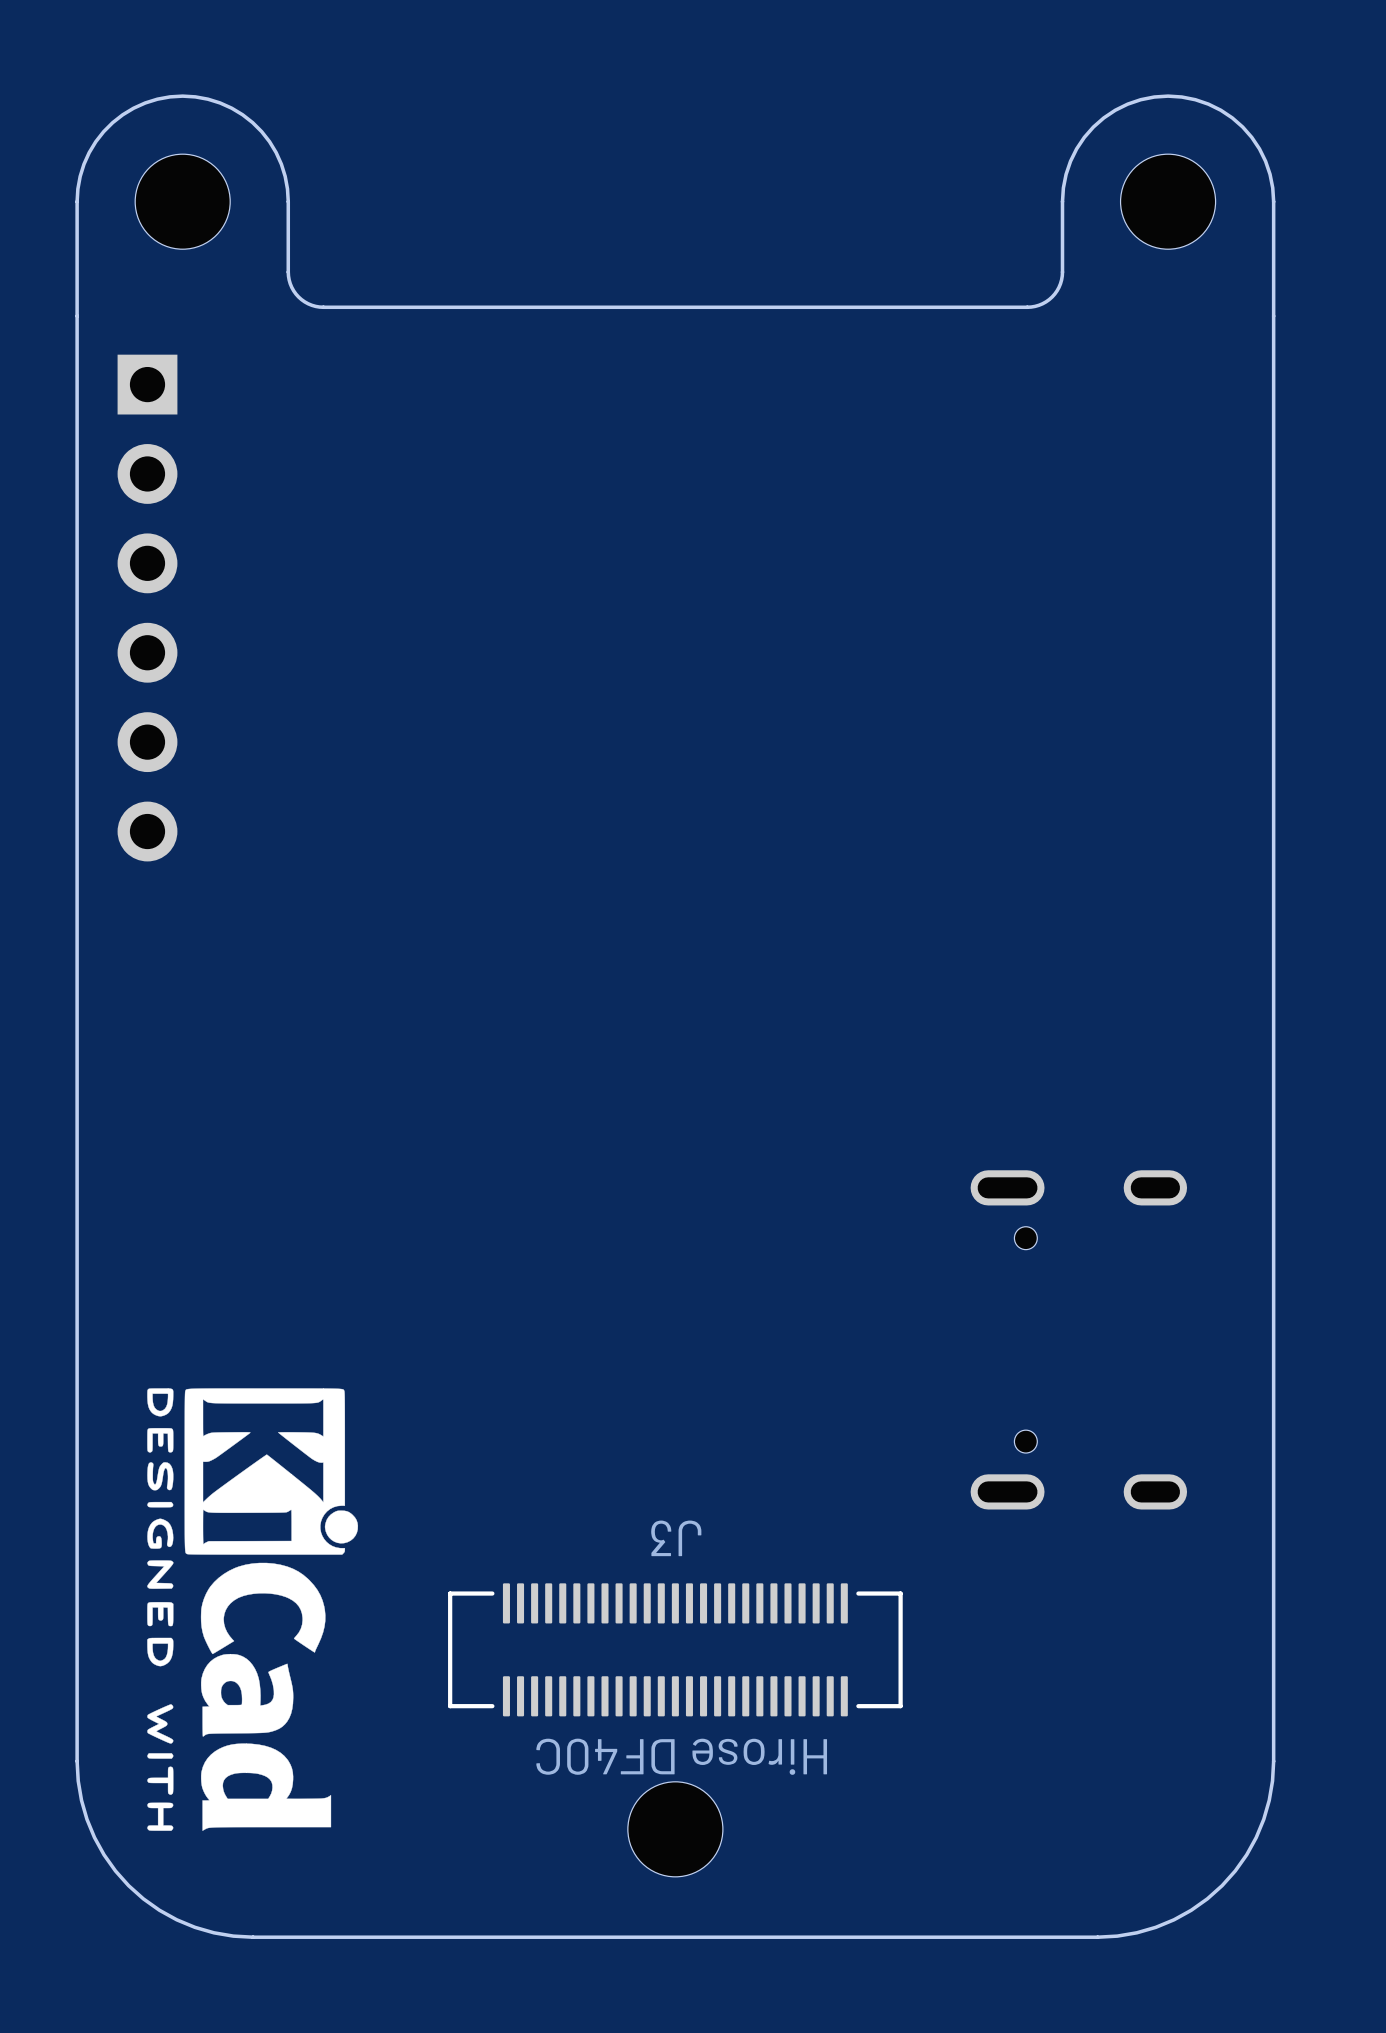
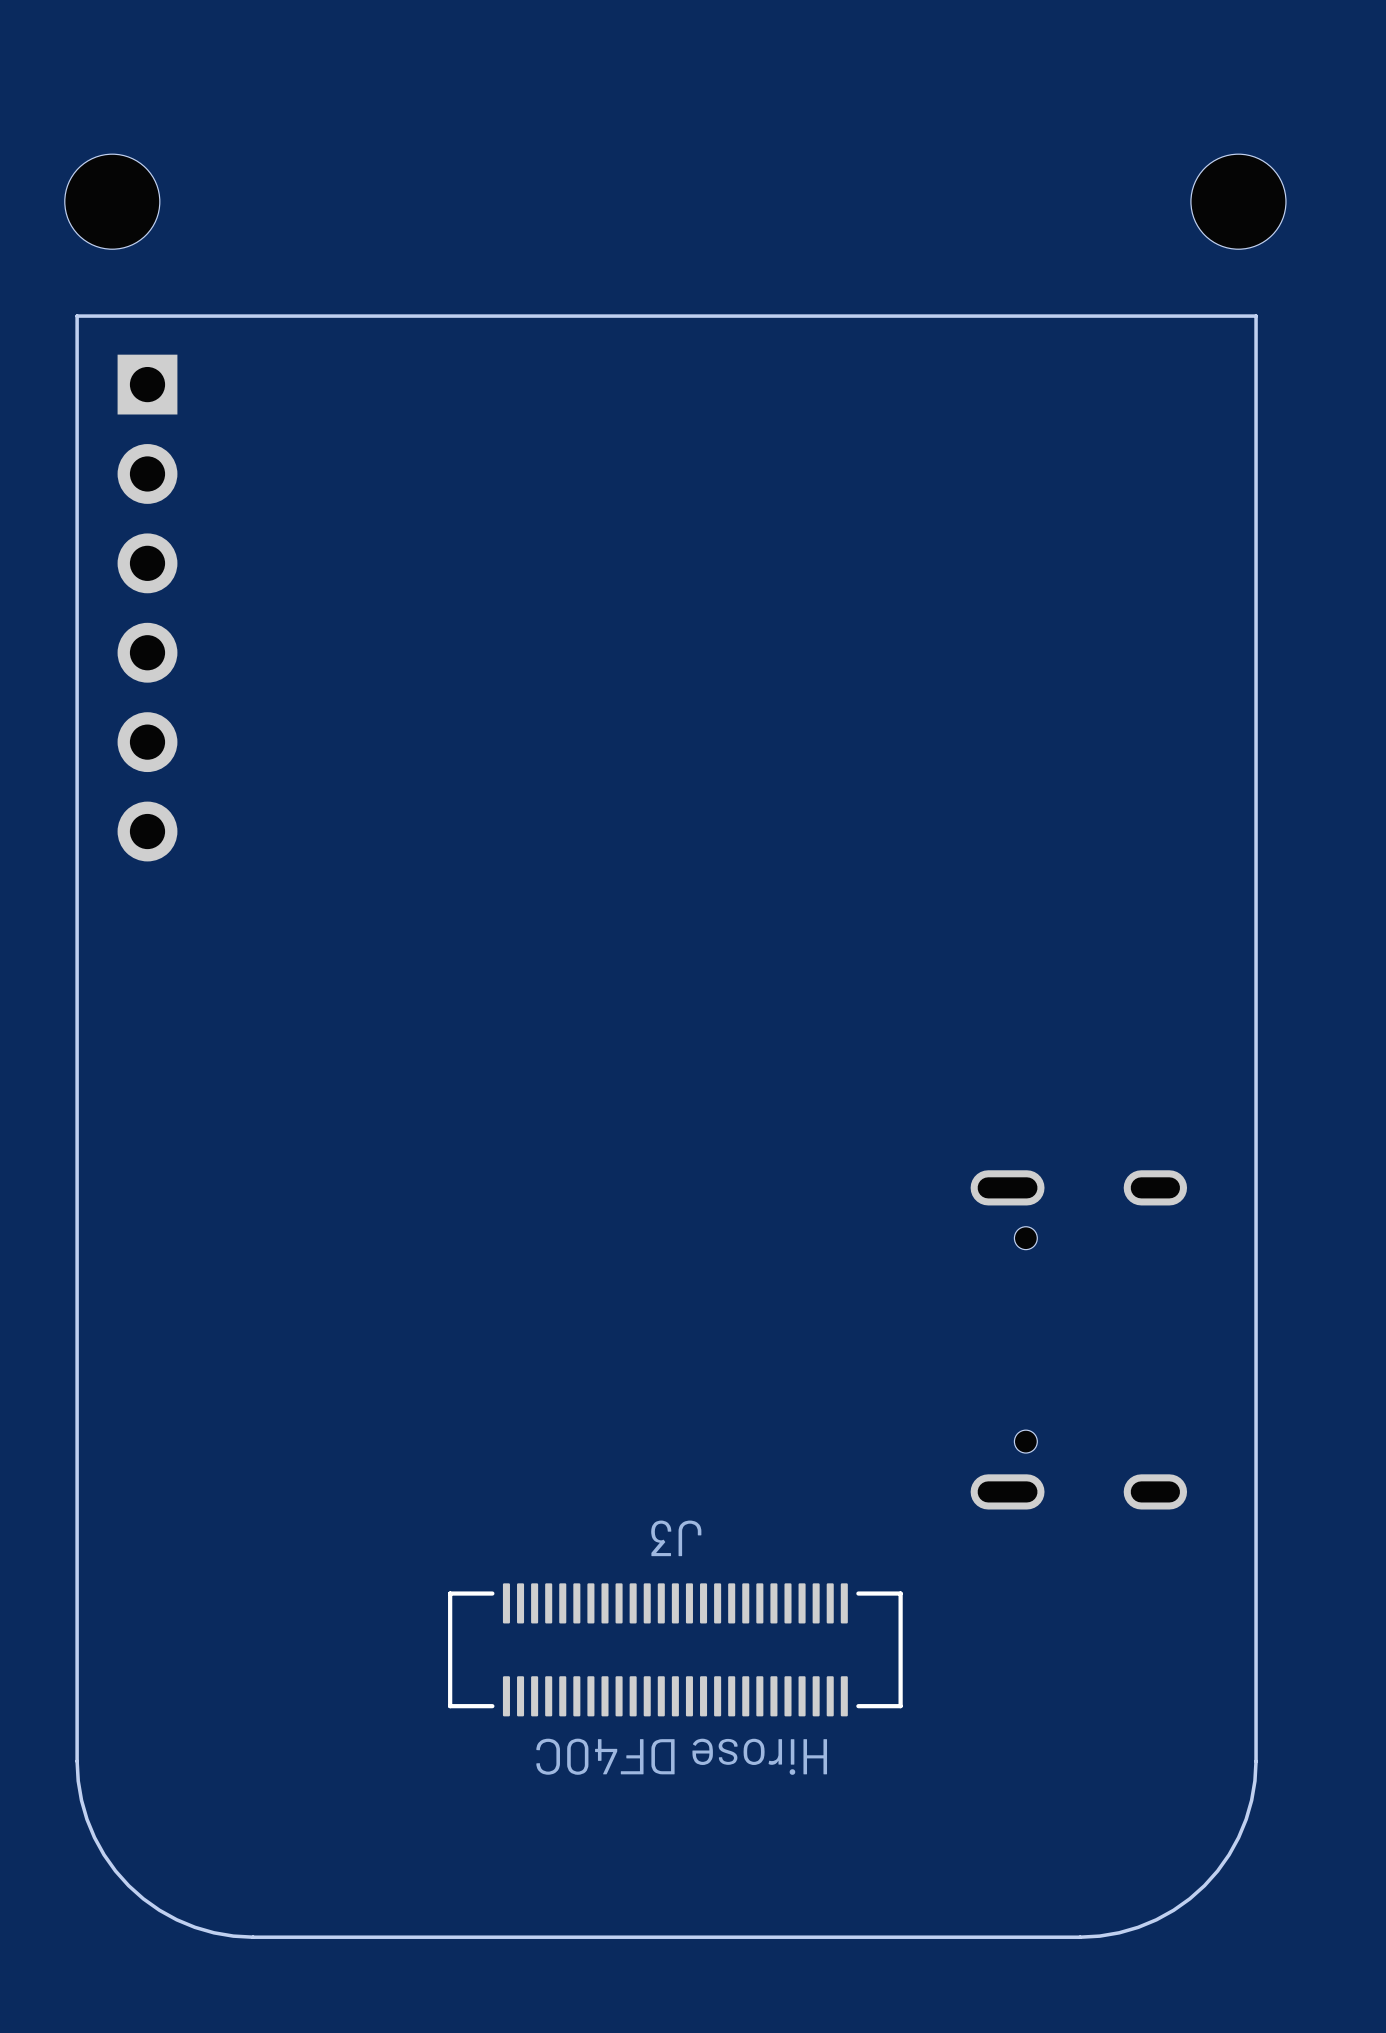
part position: (182, 201) -> (112, 201)
part position: (1168, 201) -> (1238, 201)
board edge: (77, 316) (77, 201) (80, 176) (83, 164) (95, 141) (103, 131) (122, 114) (145, 102) (169, 96) (182, 96) (207, 99) (231, 108) (252, 122) (269, 141) (281, 164) (287, 188) (288, 272) (290, 283) (295, 294) (304, 301) (323, 307) (1031, 307) (1049, 299) (1060, 283) (1062, 272) (1062, 201) (1066, 174) (1076, 148) (1084, 137) (1103, 117) (1127, 104) (1140, 99) (1168, 96) (1195, 99) (1208, 104) (1232, 117) (1242, 127) (1259, 148) (1270, 174) (1273, 201) (1272, 1780) (1263, 1819) (1256, 1837) (1235, 1870) (1207, 1898) (1174, 1919) (1155, 1927) (1117, 1936) (1080, 1937) -> (77, 316) (1256, 316) (1254, 1780) (1246, 1819) (1238, 1837) (1229, 1854) (1204, 1885) (1173, 1910) (1156, 1919) (1119, 1932) (1080, 1937)
drawing: [147, 1388, 359, 1831] -> none
part: (675, 1829) -> none

